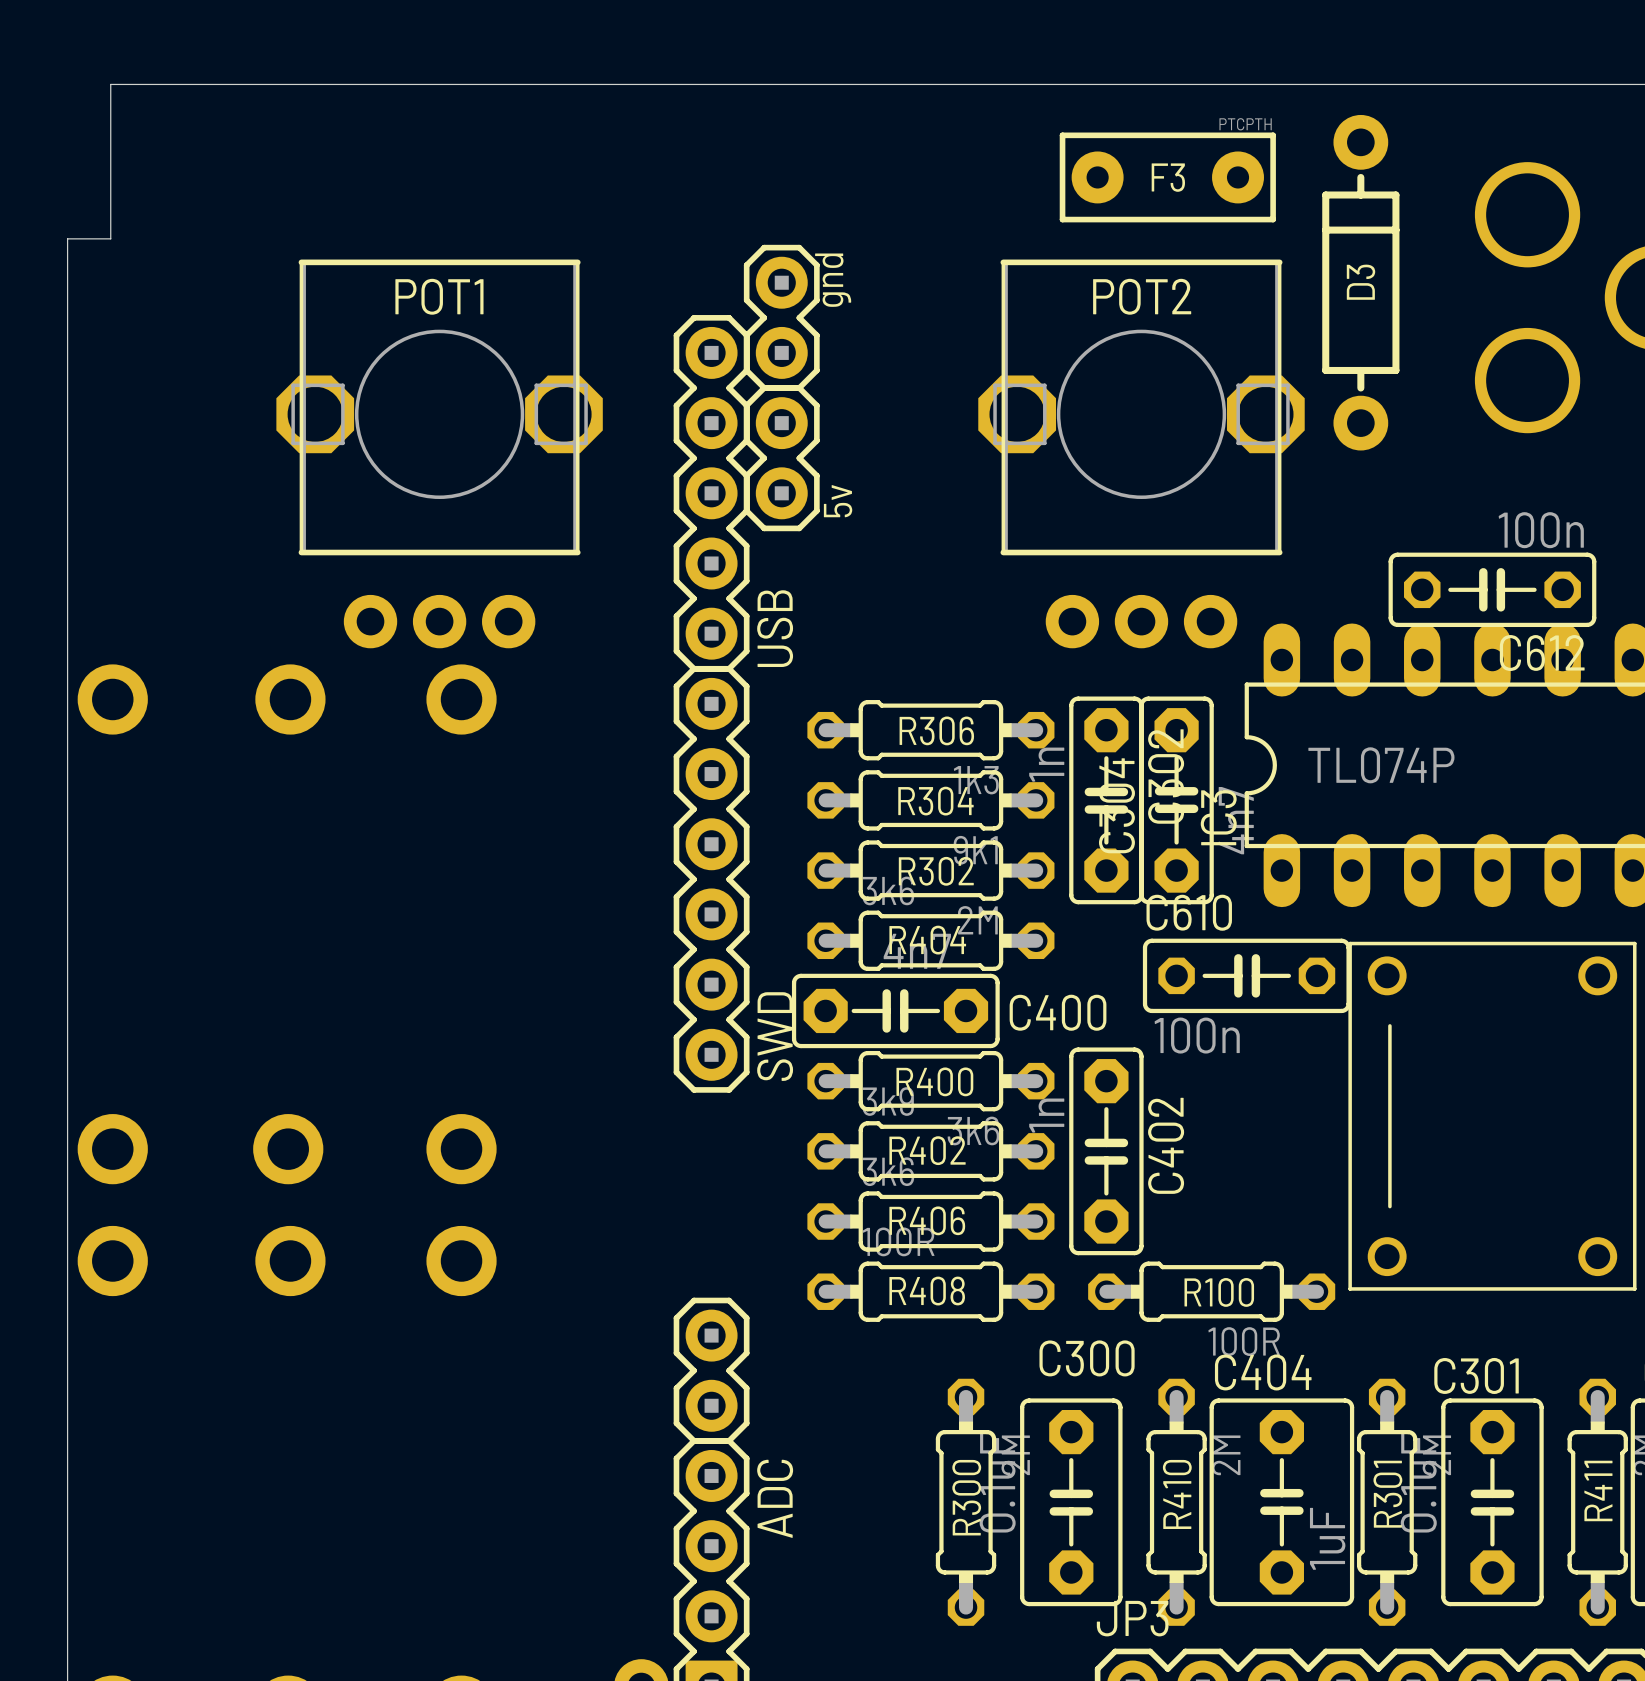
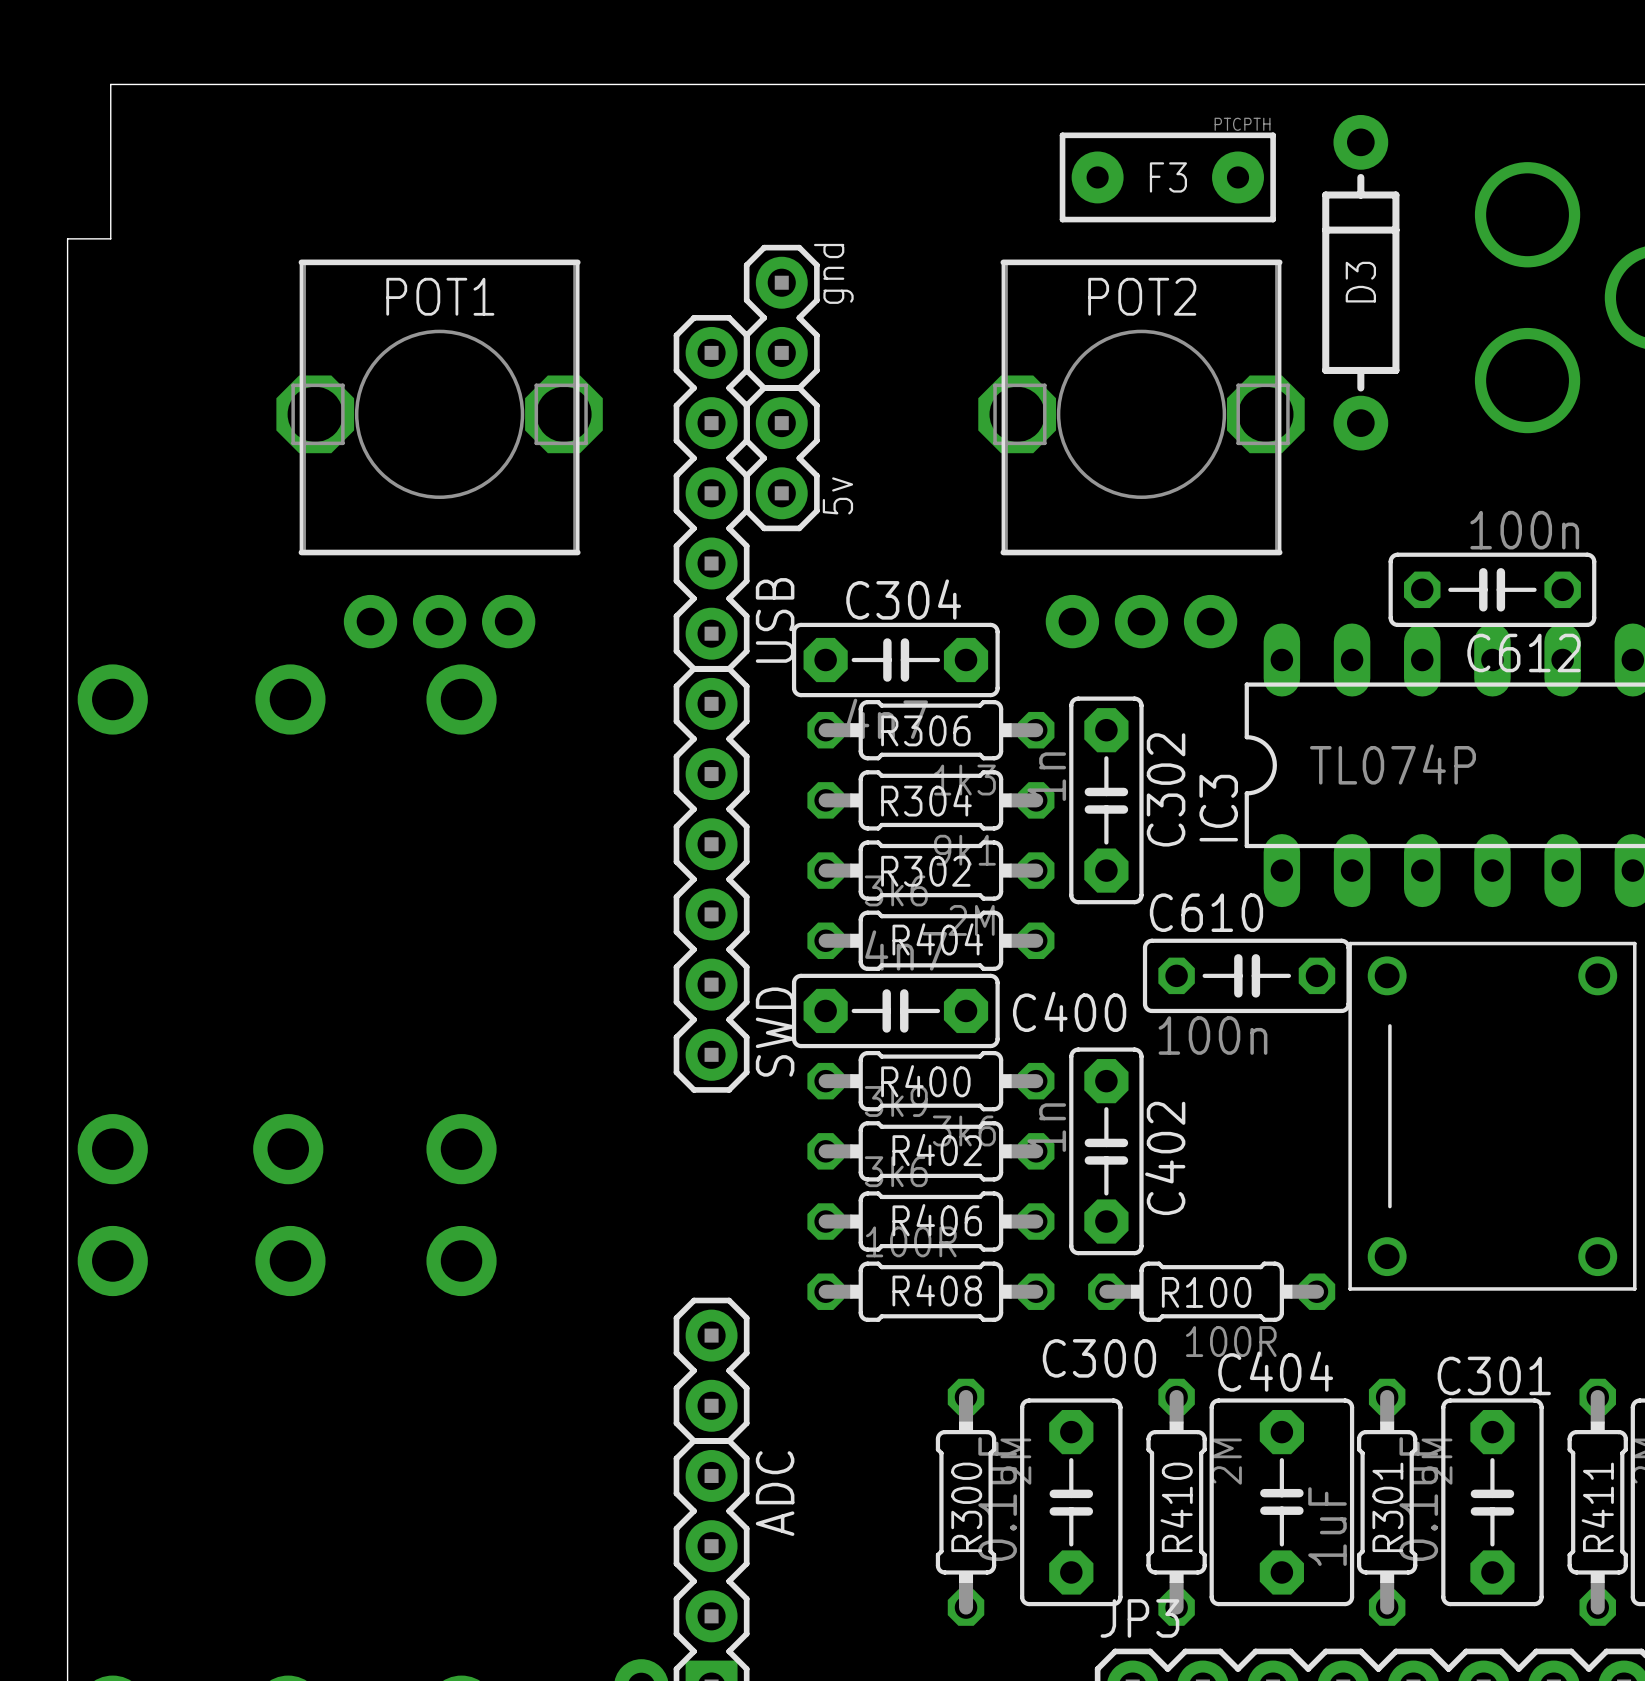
C304 rotation: 0° (1176, 800) -> 90° clockwise (895, 660)
C304 position: (1176, 800) -> (895, 660)

